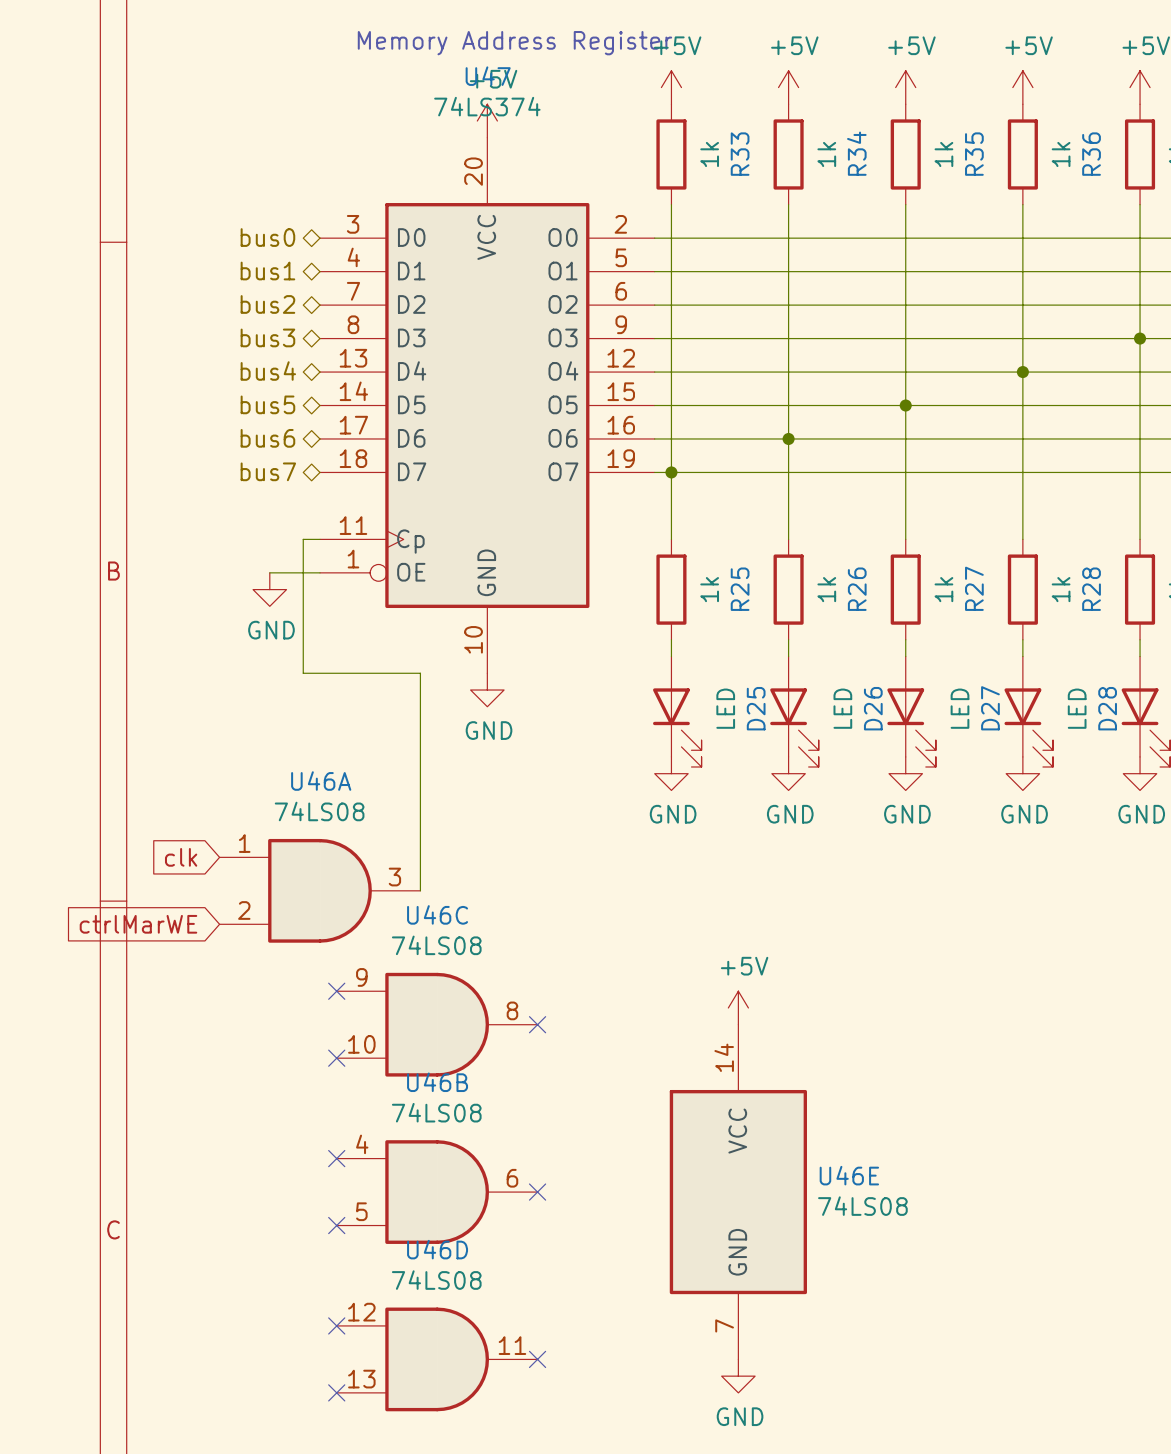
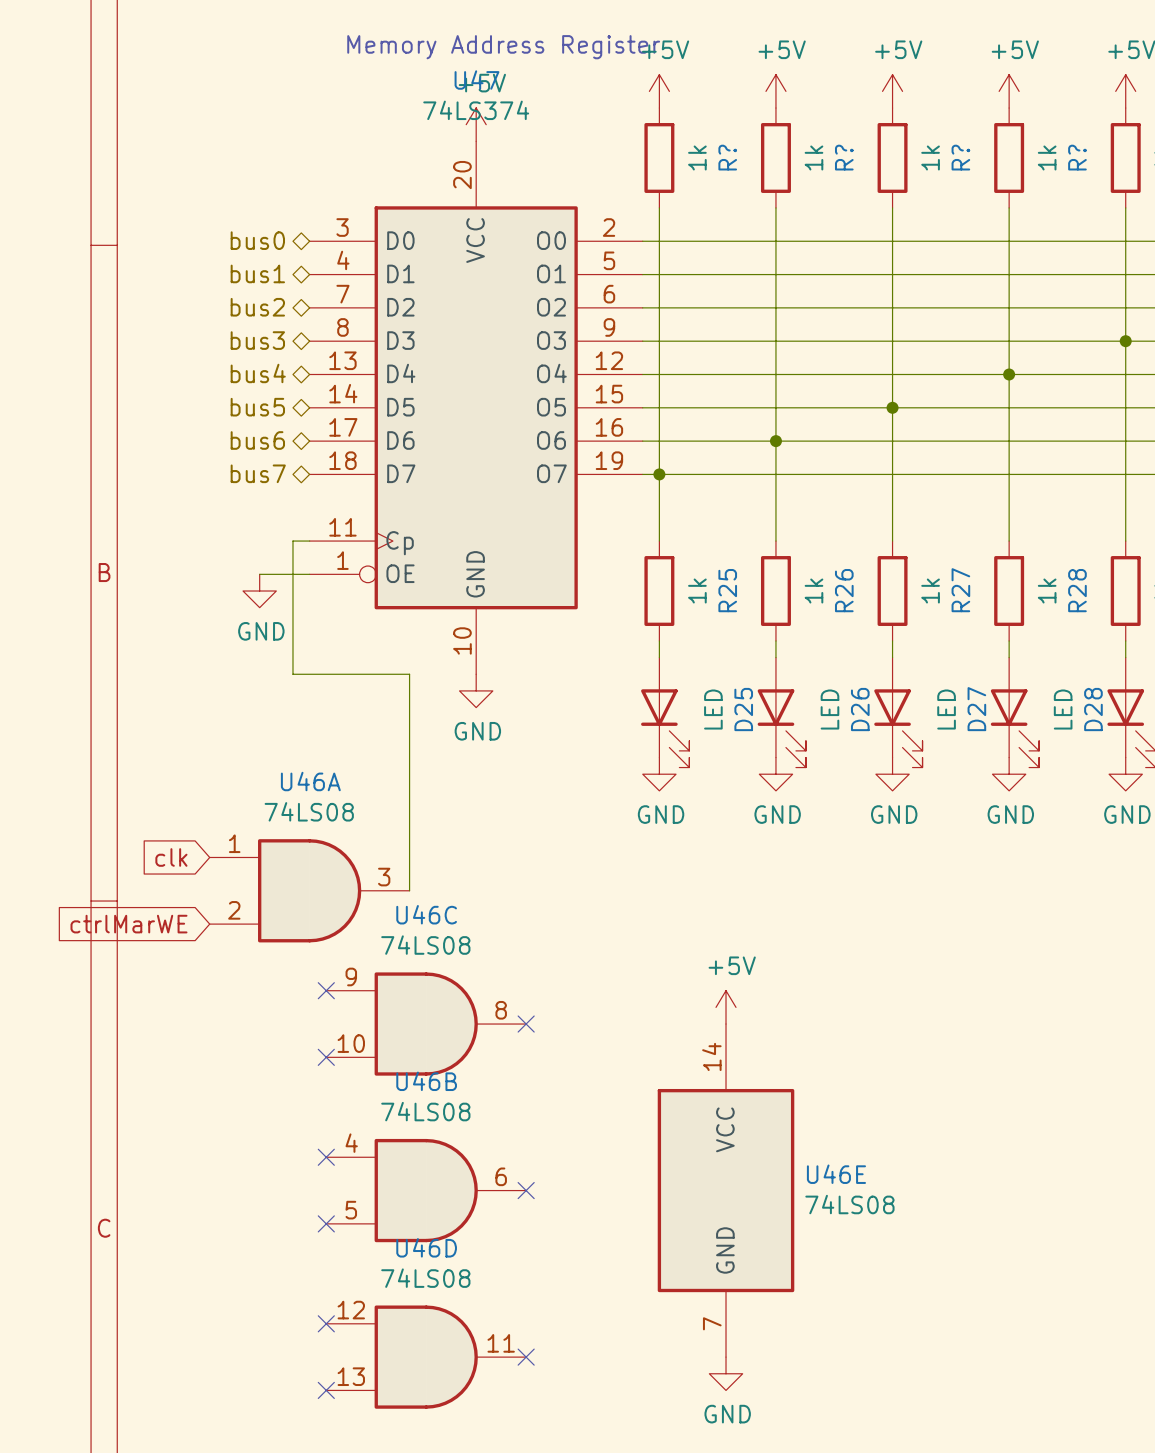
R34 name: R34 (856, 153) -> R? (844, 157)
R33 name: R33 (740, 154) -> R? (727, 157)
R35 name: R35 (974, 154) -> R? (960, 157)
R36 name: R36 (1091, 154) -> R? (1077, 157)

